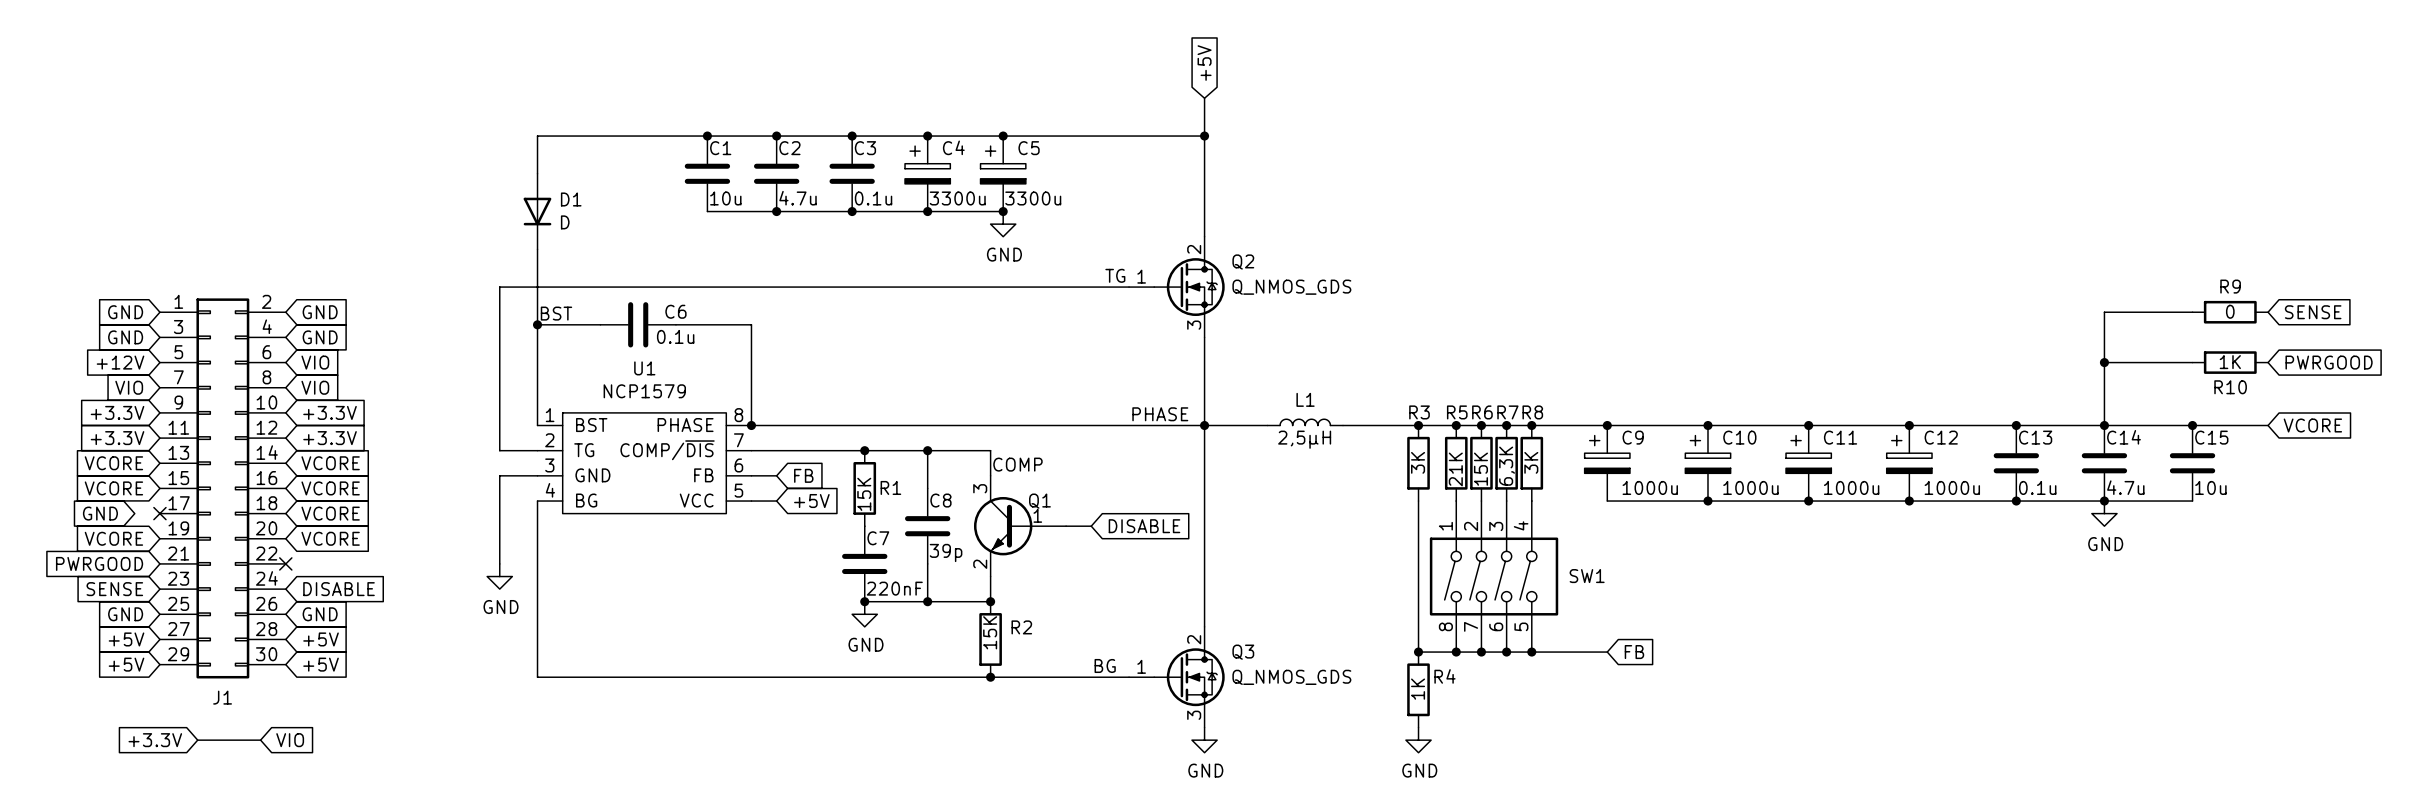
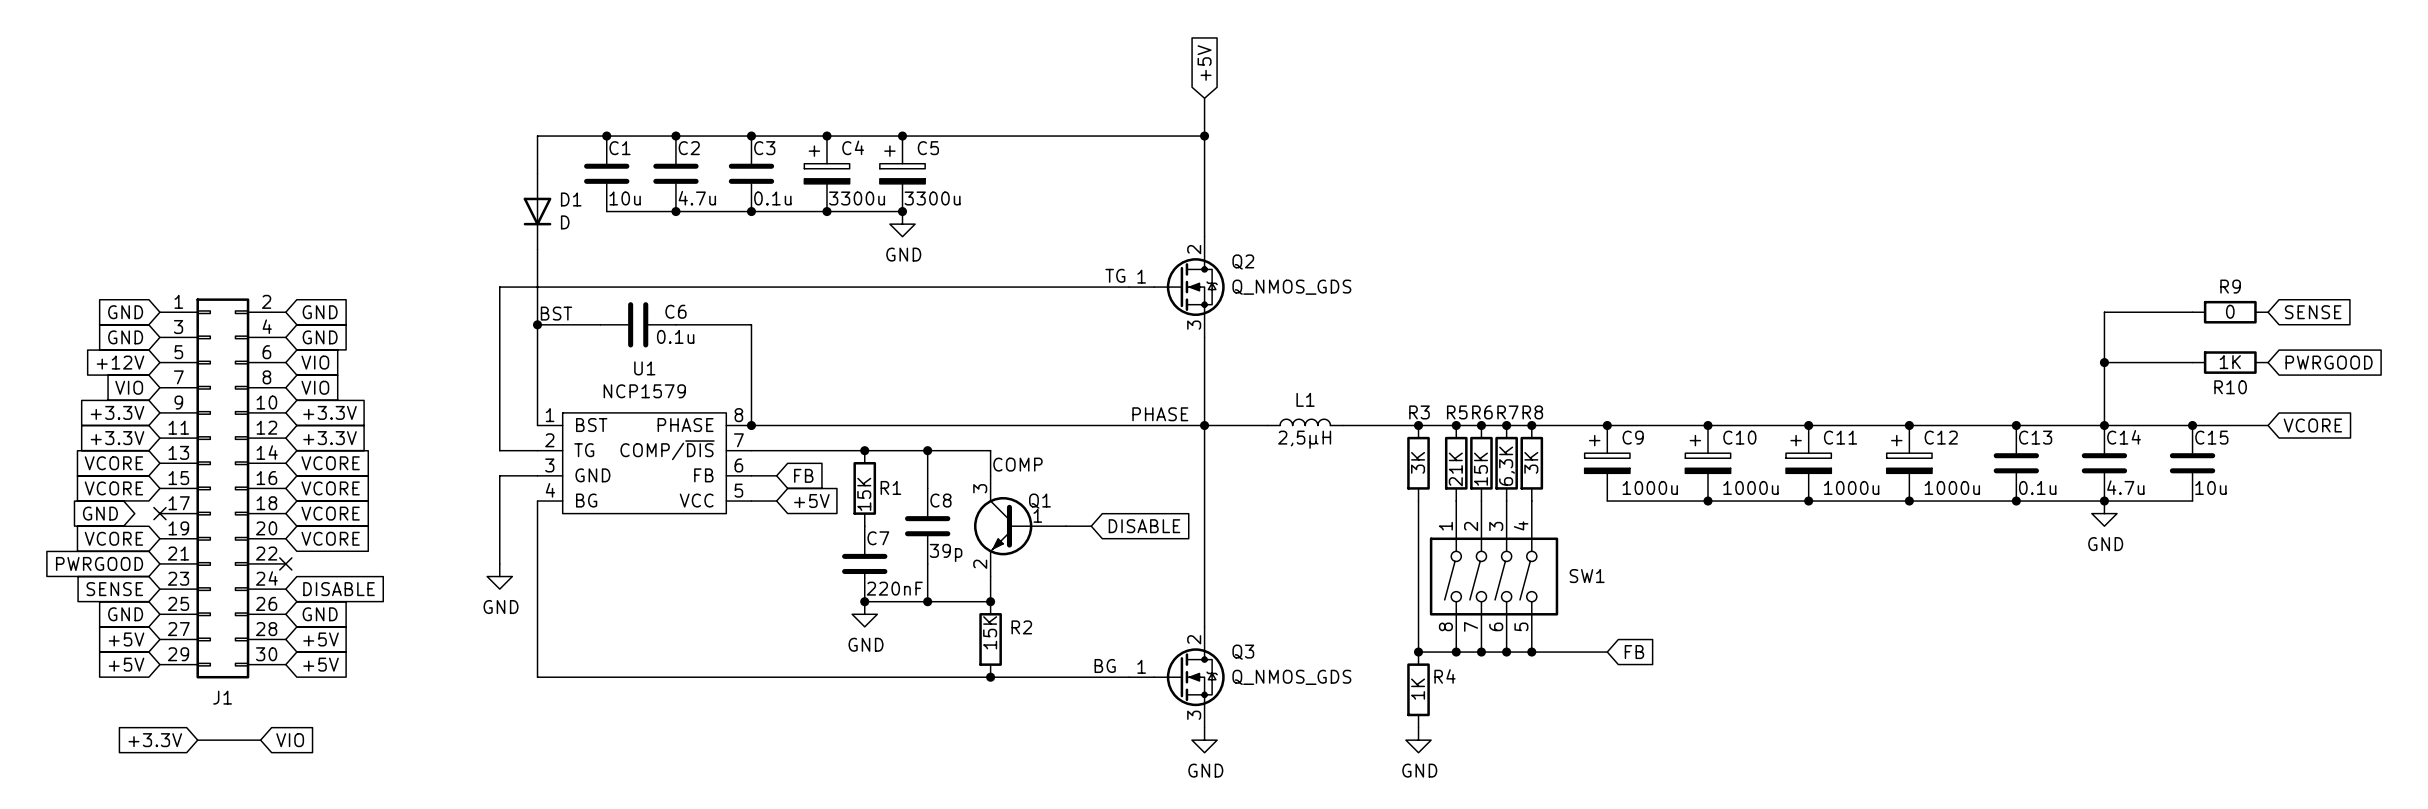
junction: none -> (606, 136)
junction: none -> (675, 136)
junction: (707, 136) -> none
junction: none -> (751, 136)
junction: (776, 136) -> none
junction: none -> (826, 136)
junction: (852, 136) -> none
junction: none -> (902, 136)
junction: (927, 136) -> none
junction: (1003, 136) -> none
C1 position: (707, 173) -> (606, 173)
C2 position: (776, 173) -> (675, 173)
C3 position: (852, 173) -> (751, 173)
C4 position: (927, 173) -> (826, 173)
C5 position: (1003, 173) -> (902, 173)
wire: none -> (606, 211) (707, 211)
junction: none -> (675, 211)
junction: none -> (751, 211)
junction: (776, 211) -> none
junction: none -> (826, 211)
junction: (852, 211) -> none
wire: (902, 211) (1003, 211) -> none
junction: none -> (902, 211)
junction: (927, 211) -> none
junction: (1003, 211) -> none
power symbol position: GND (1003, 224) -> GND (902, 224)

